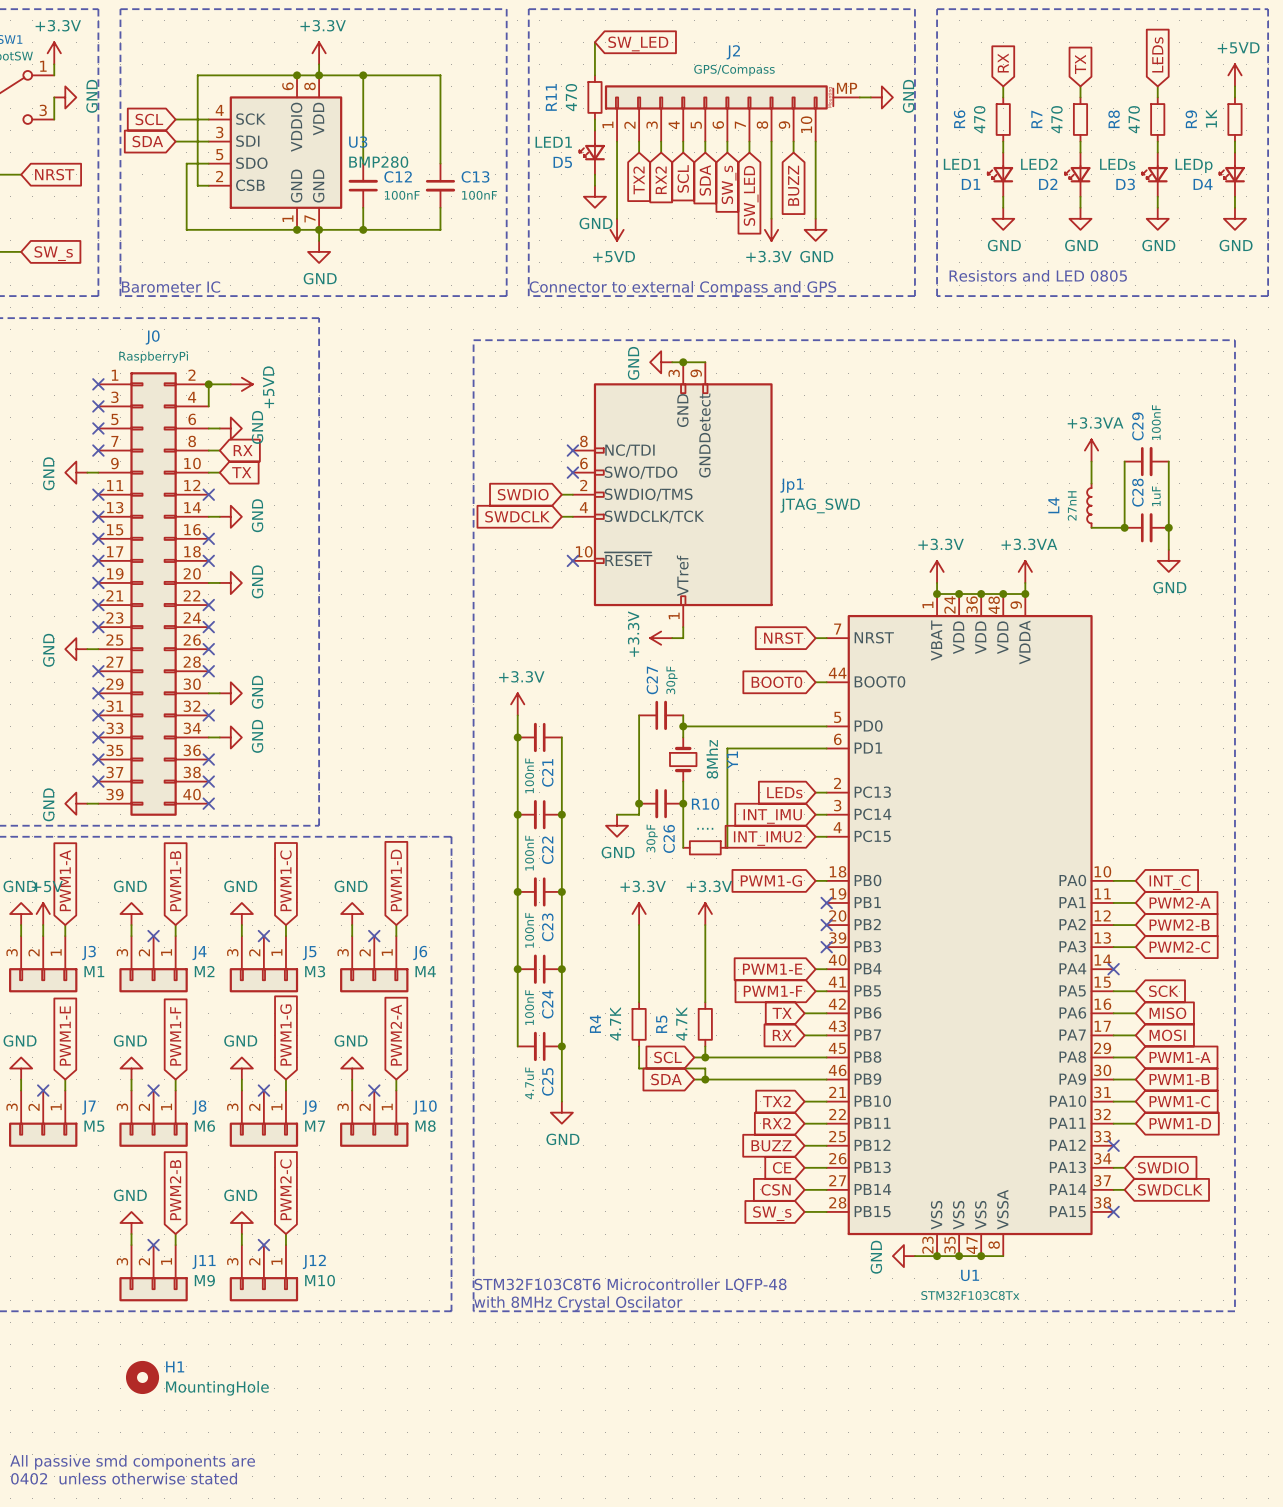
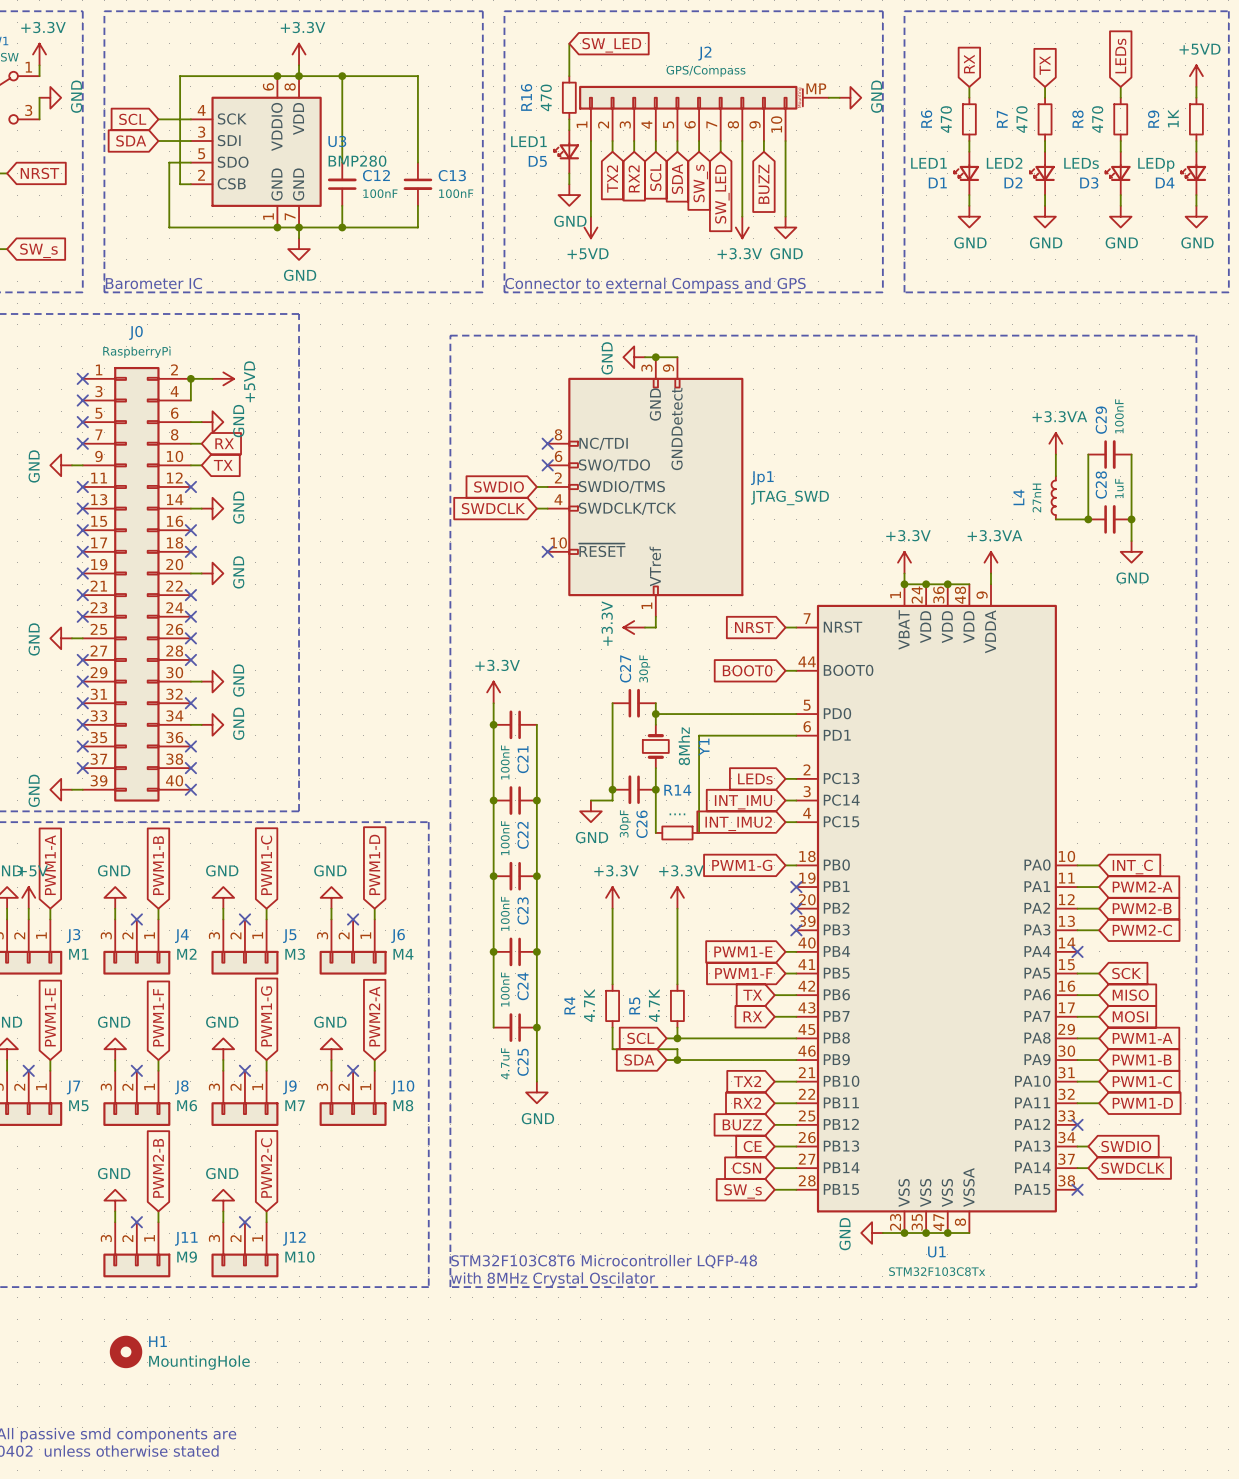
R11 name: R11 (551, 97) -> R16 (526, 97)
text: Resistors and LED 0805 (1038, 275) -> none
wire: (1003, 594) (1025, 594) -> none
junction: (1003, 594) -> none
junction: (1025, 594) -> none
R10 name: R10 (705, 804) -> R14 (677, 790)

